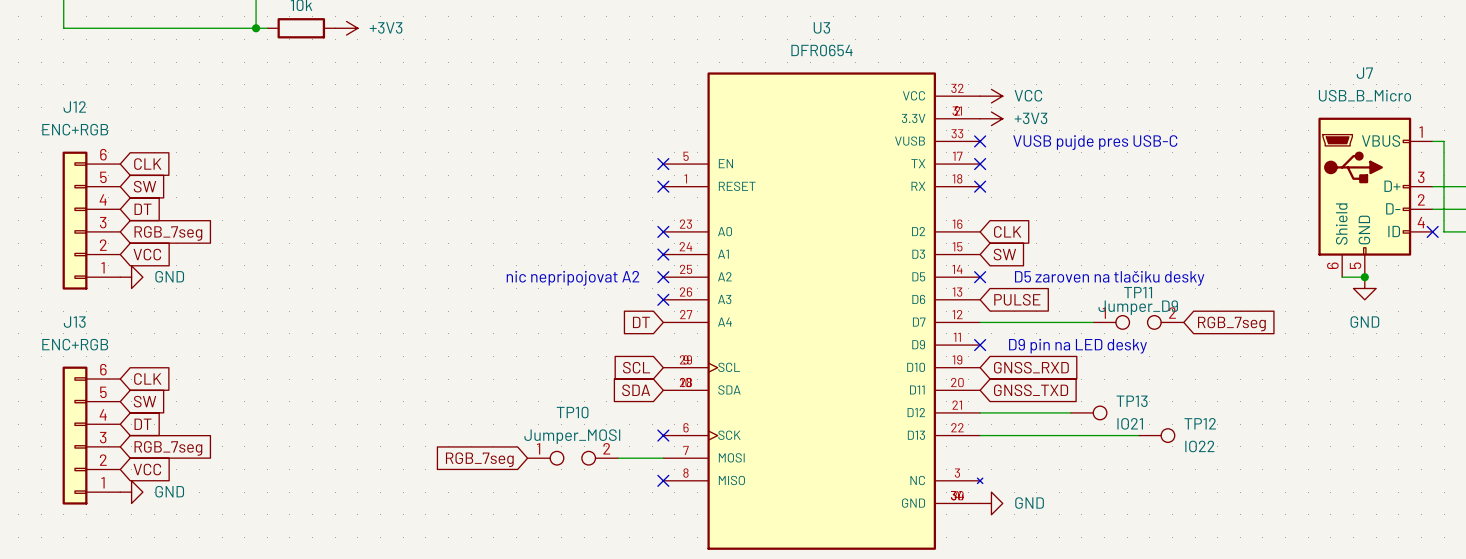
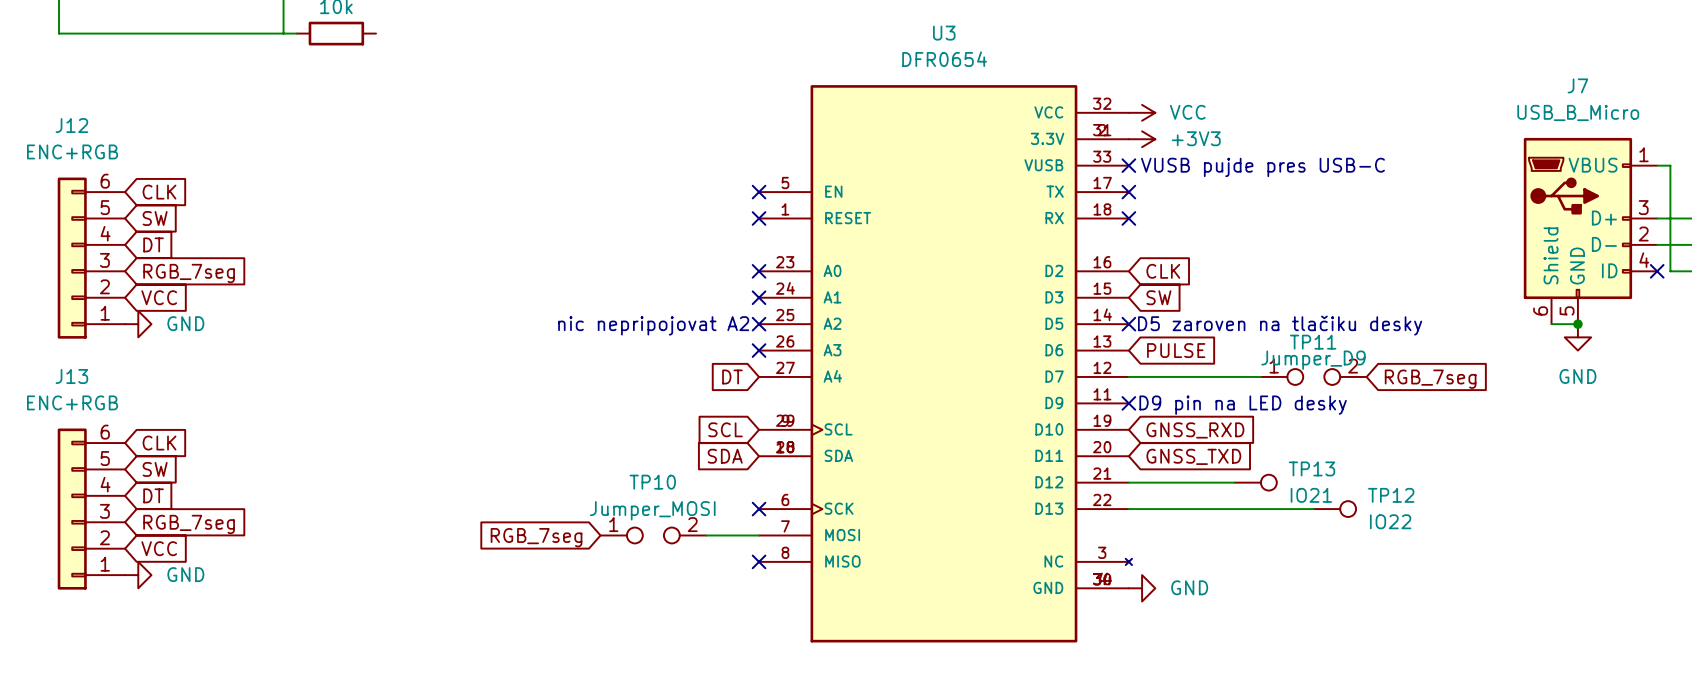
junction: (256, 28) -> none
power symbol: +3V3 (346, 28) -> none

